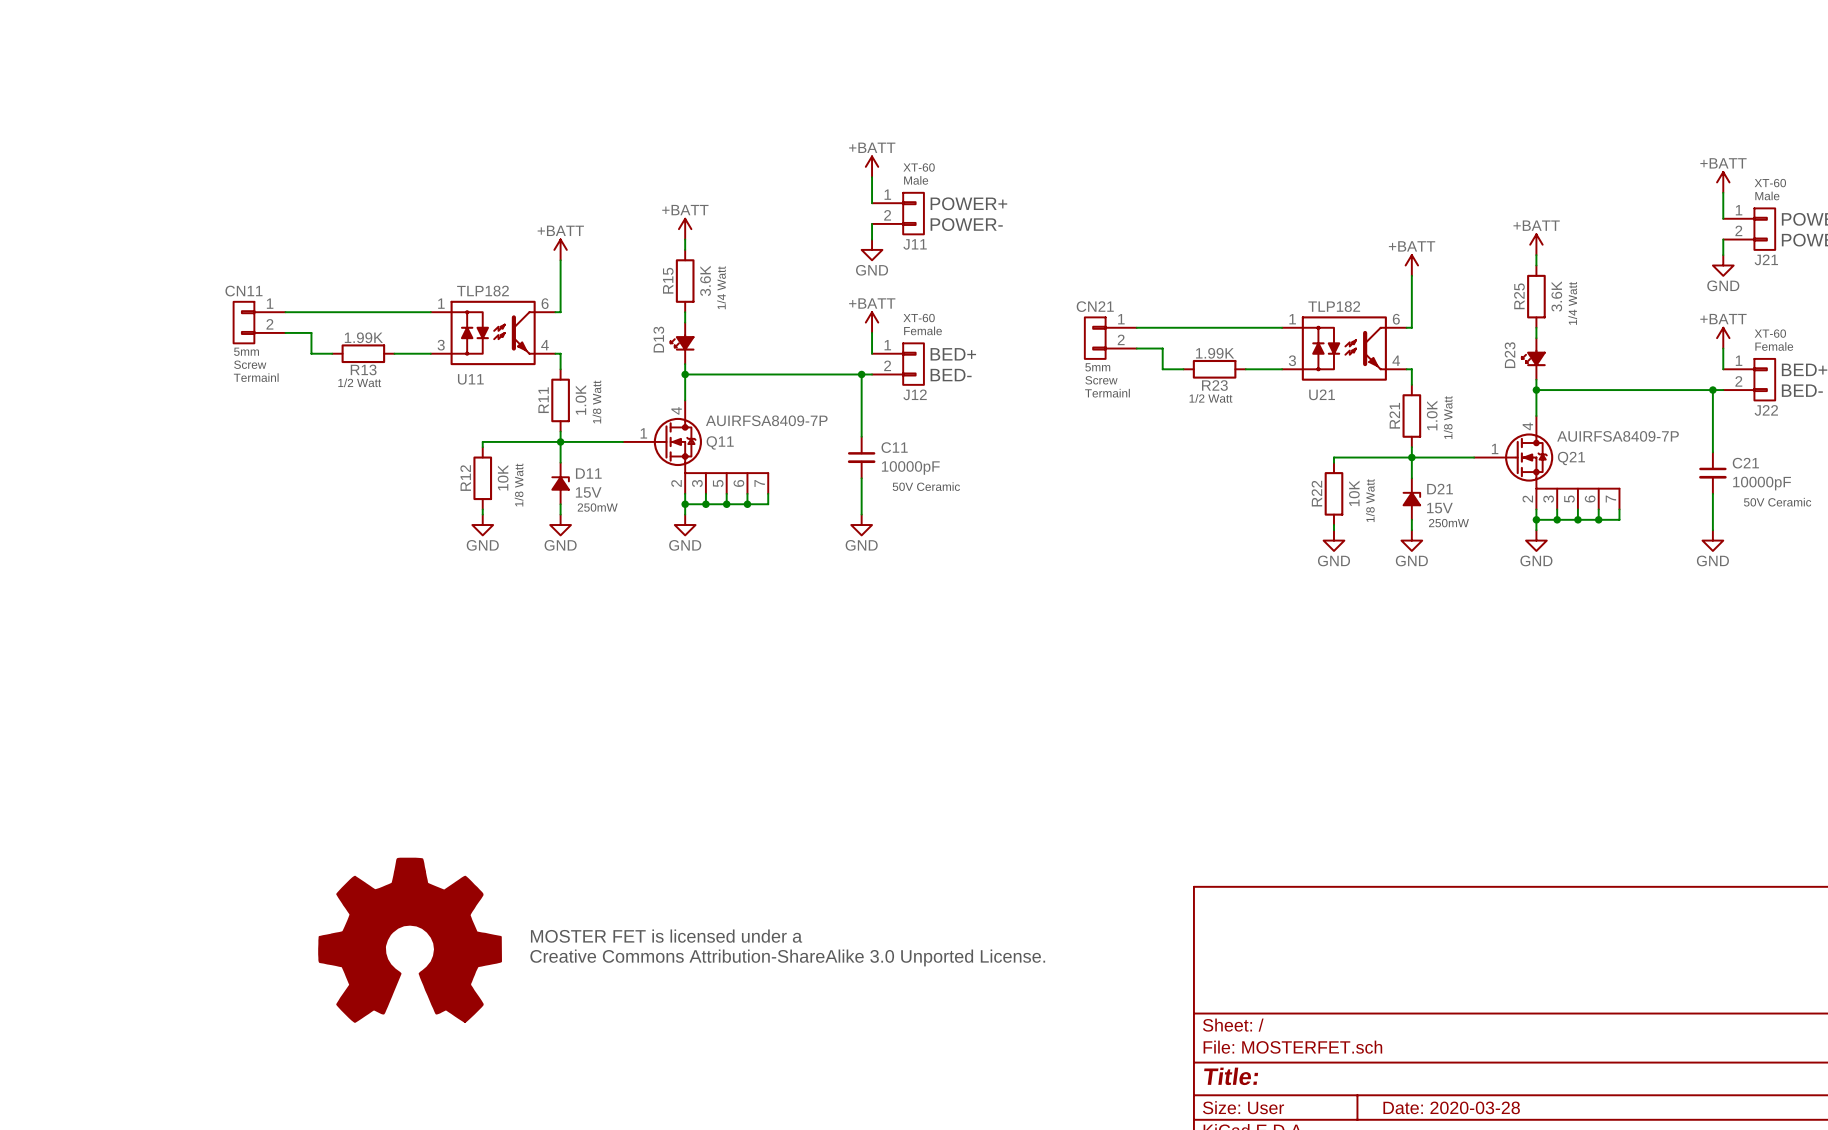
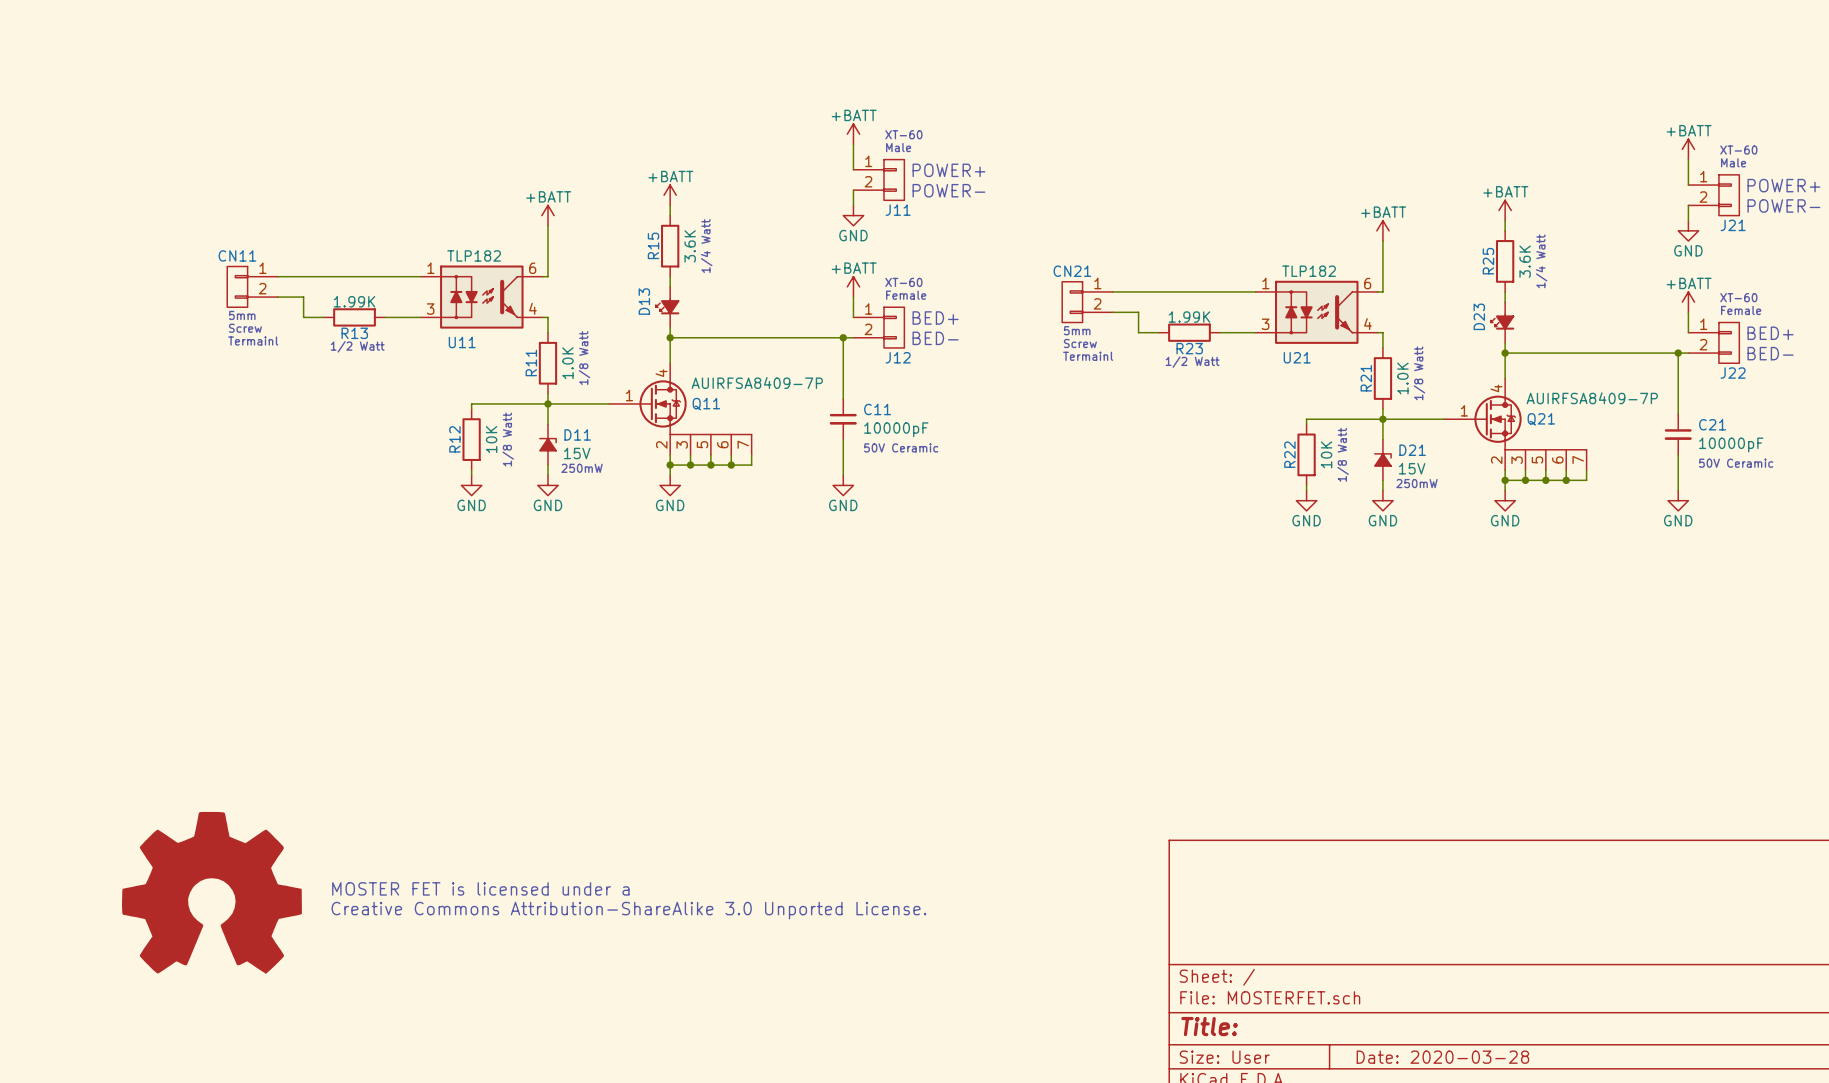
text position: MOSTER FET is licensed under a (666, 936) -> MOSTER FET is licensed under a (480, 888)
part position: (410, 940) -> (211, 892)
text position: Creative Commons Attribution-ShareAlike 3.0 Unported License. (787, 957) -> Creative Commons Attribution-ShareAlike 3.0 Unported License. (628, 910)

